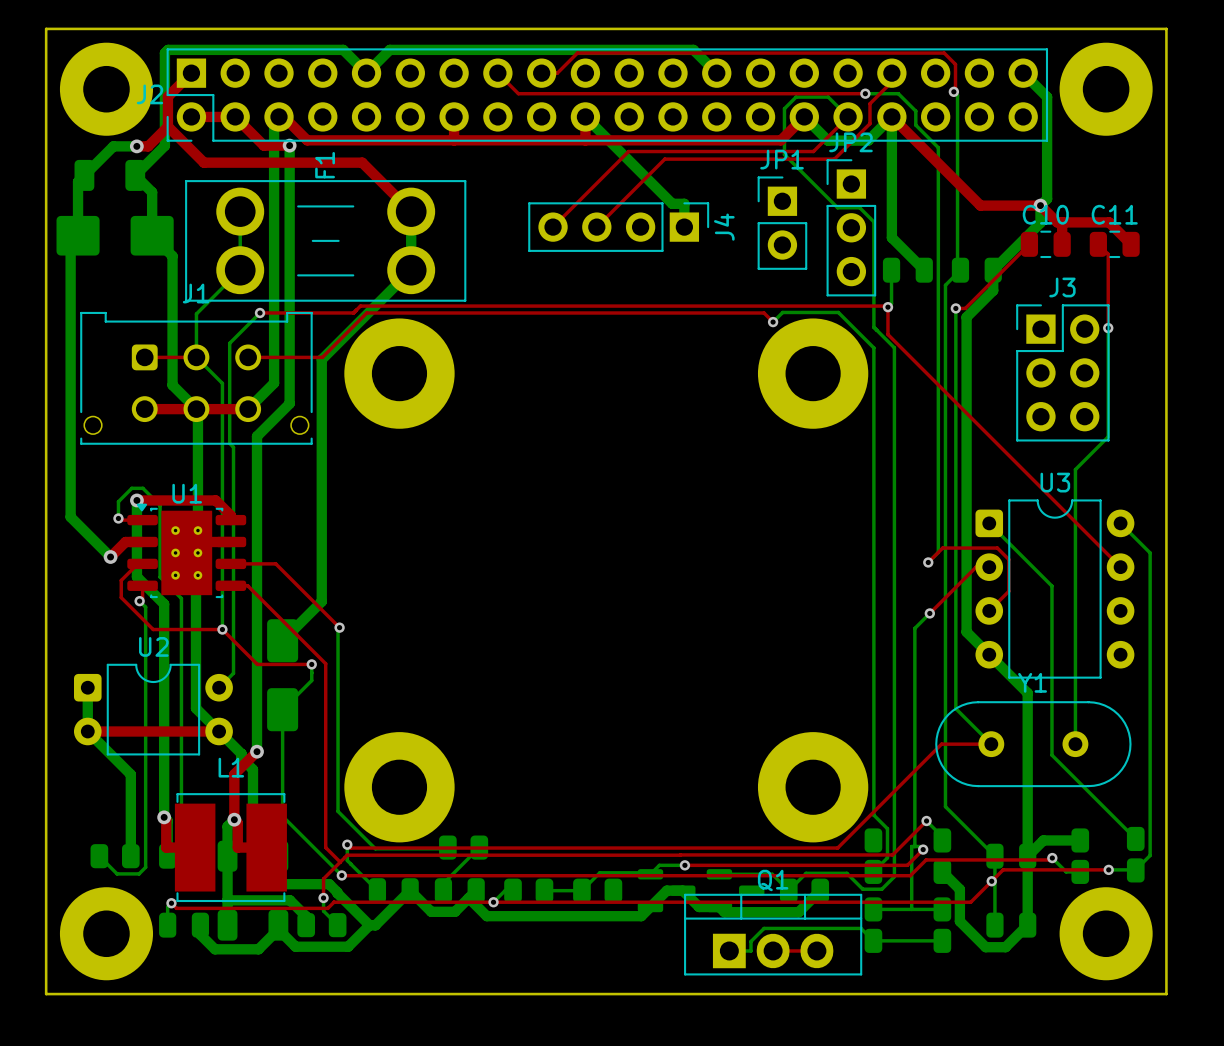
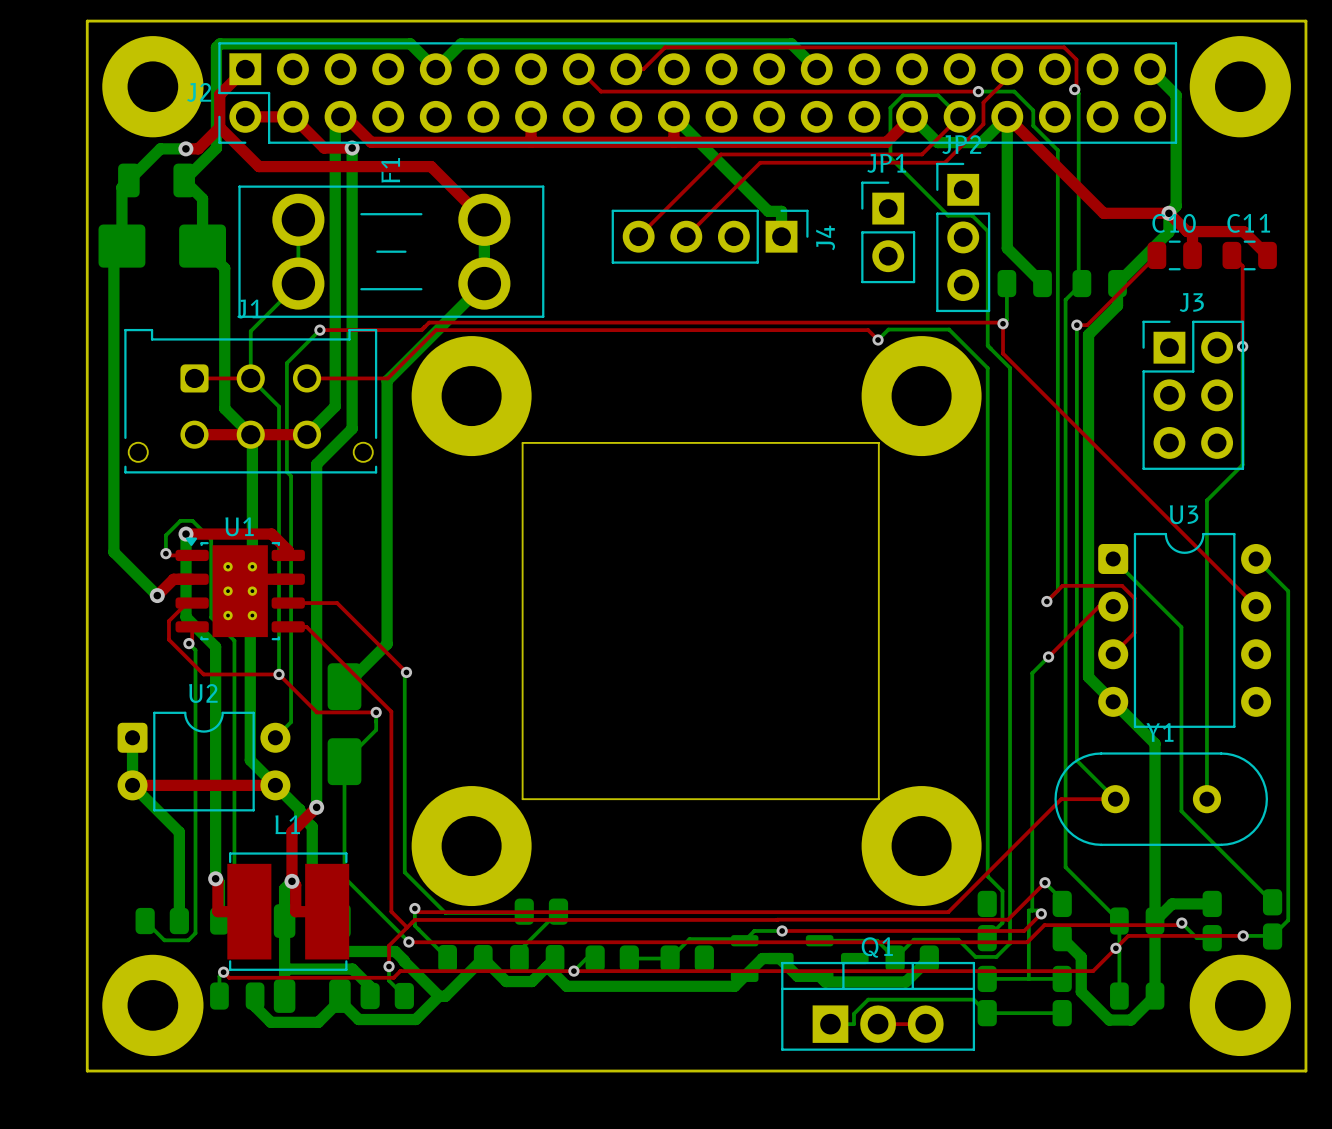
board edge: none -> (522, 442) (878, 442) (878, 799) (522, 799) (522, 442)

